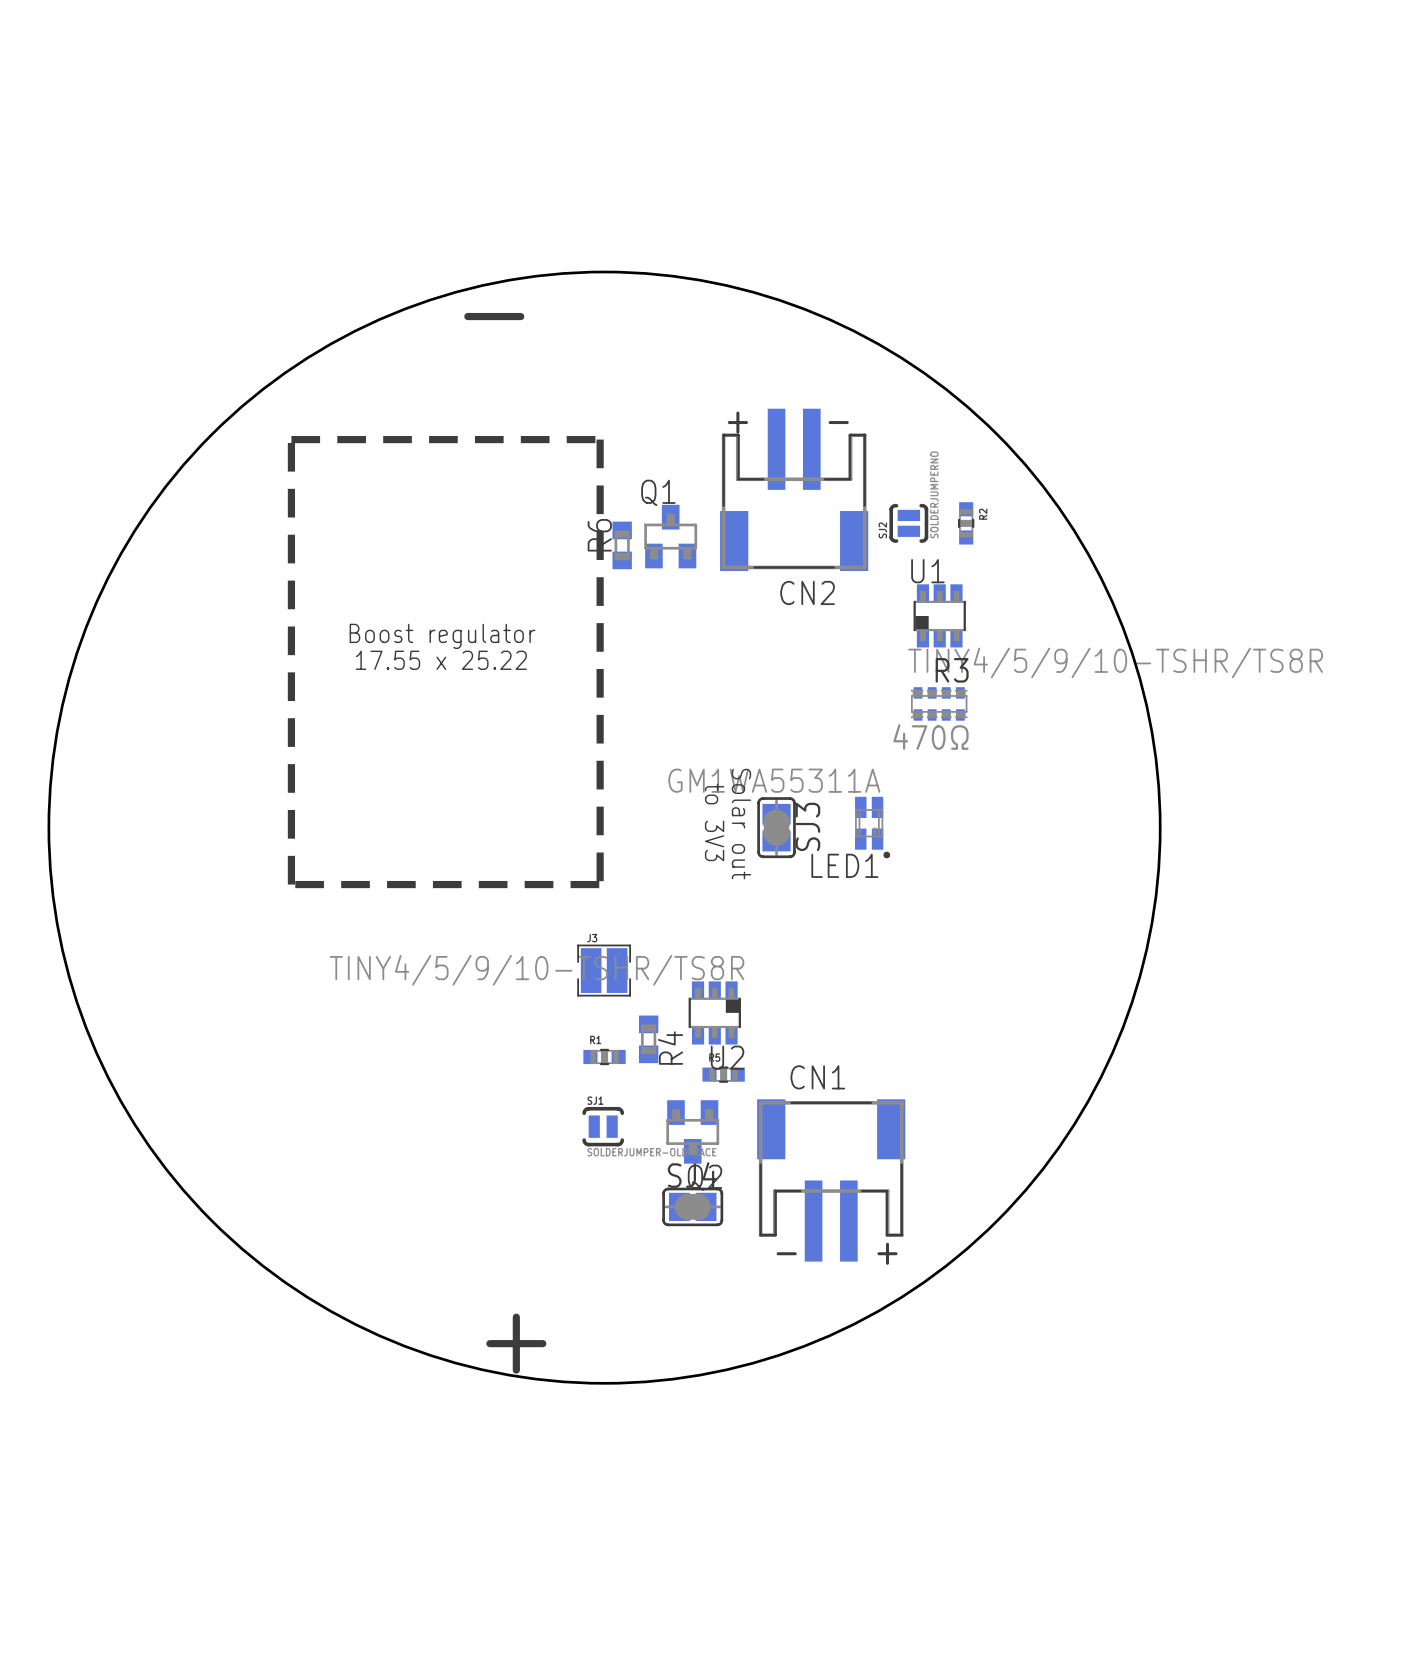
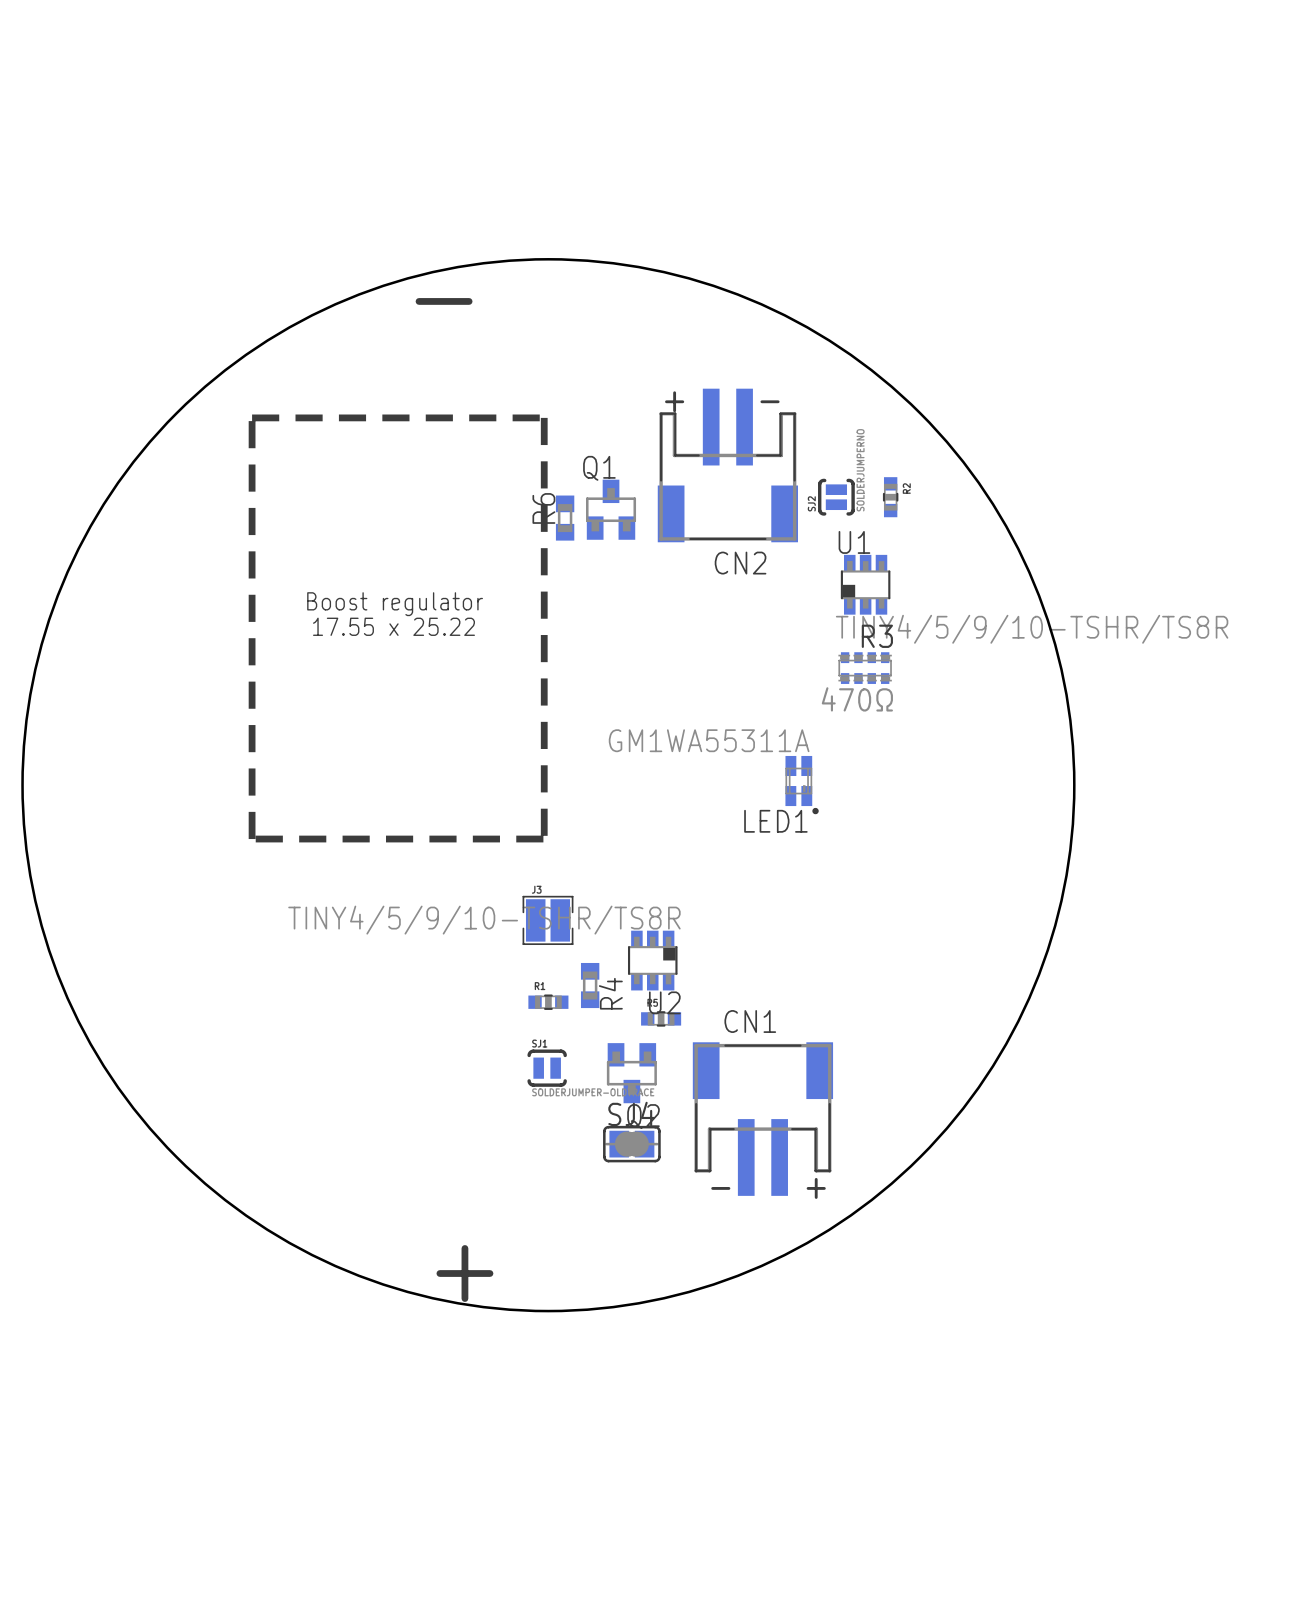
text: to 3V3 (714, 822) -> none
text: Solar out (741, 824) -> none
SJ3: (776, 827) -> none

